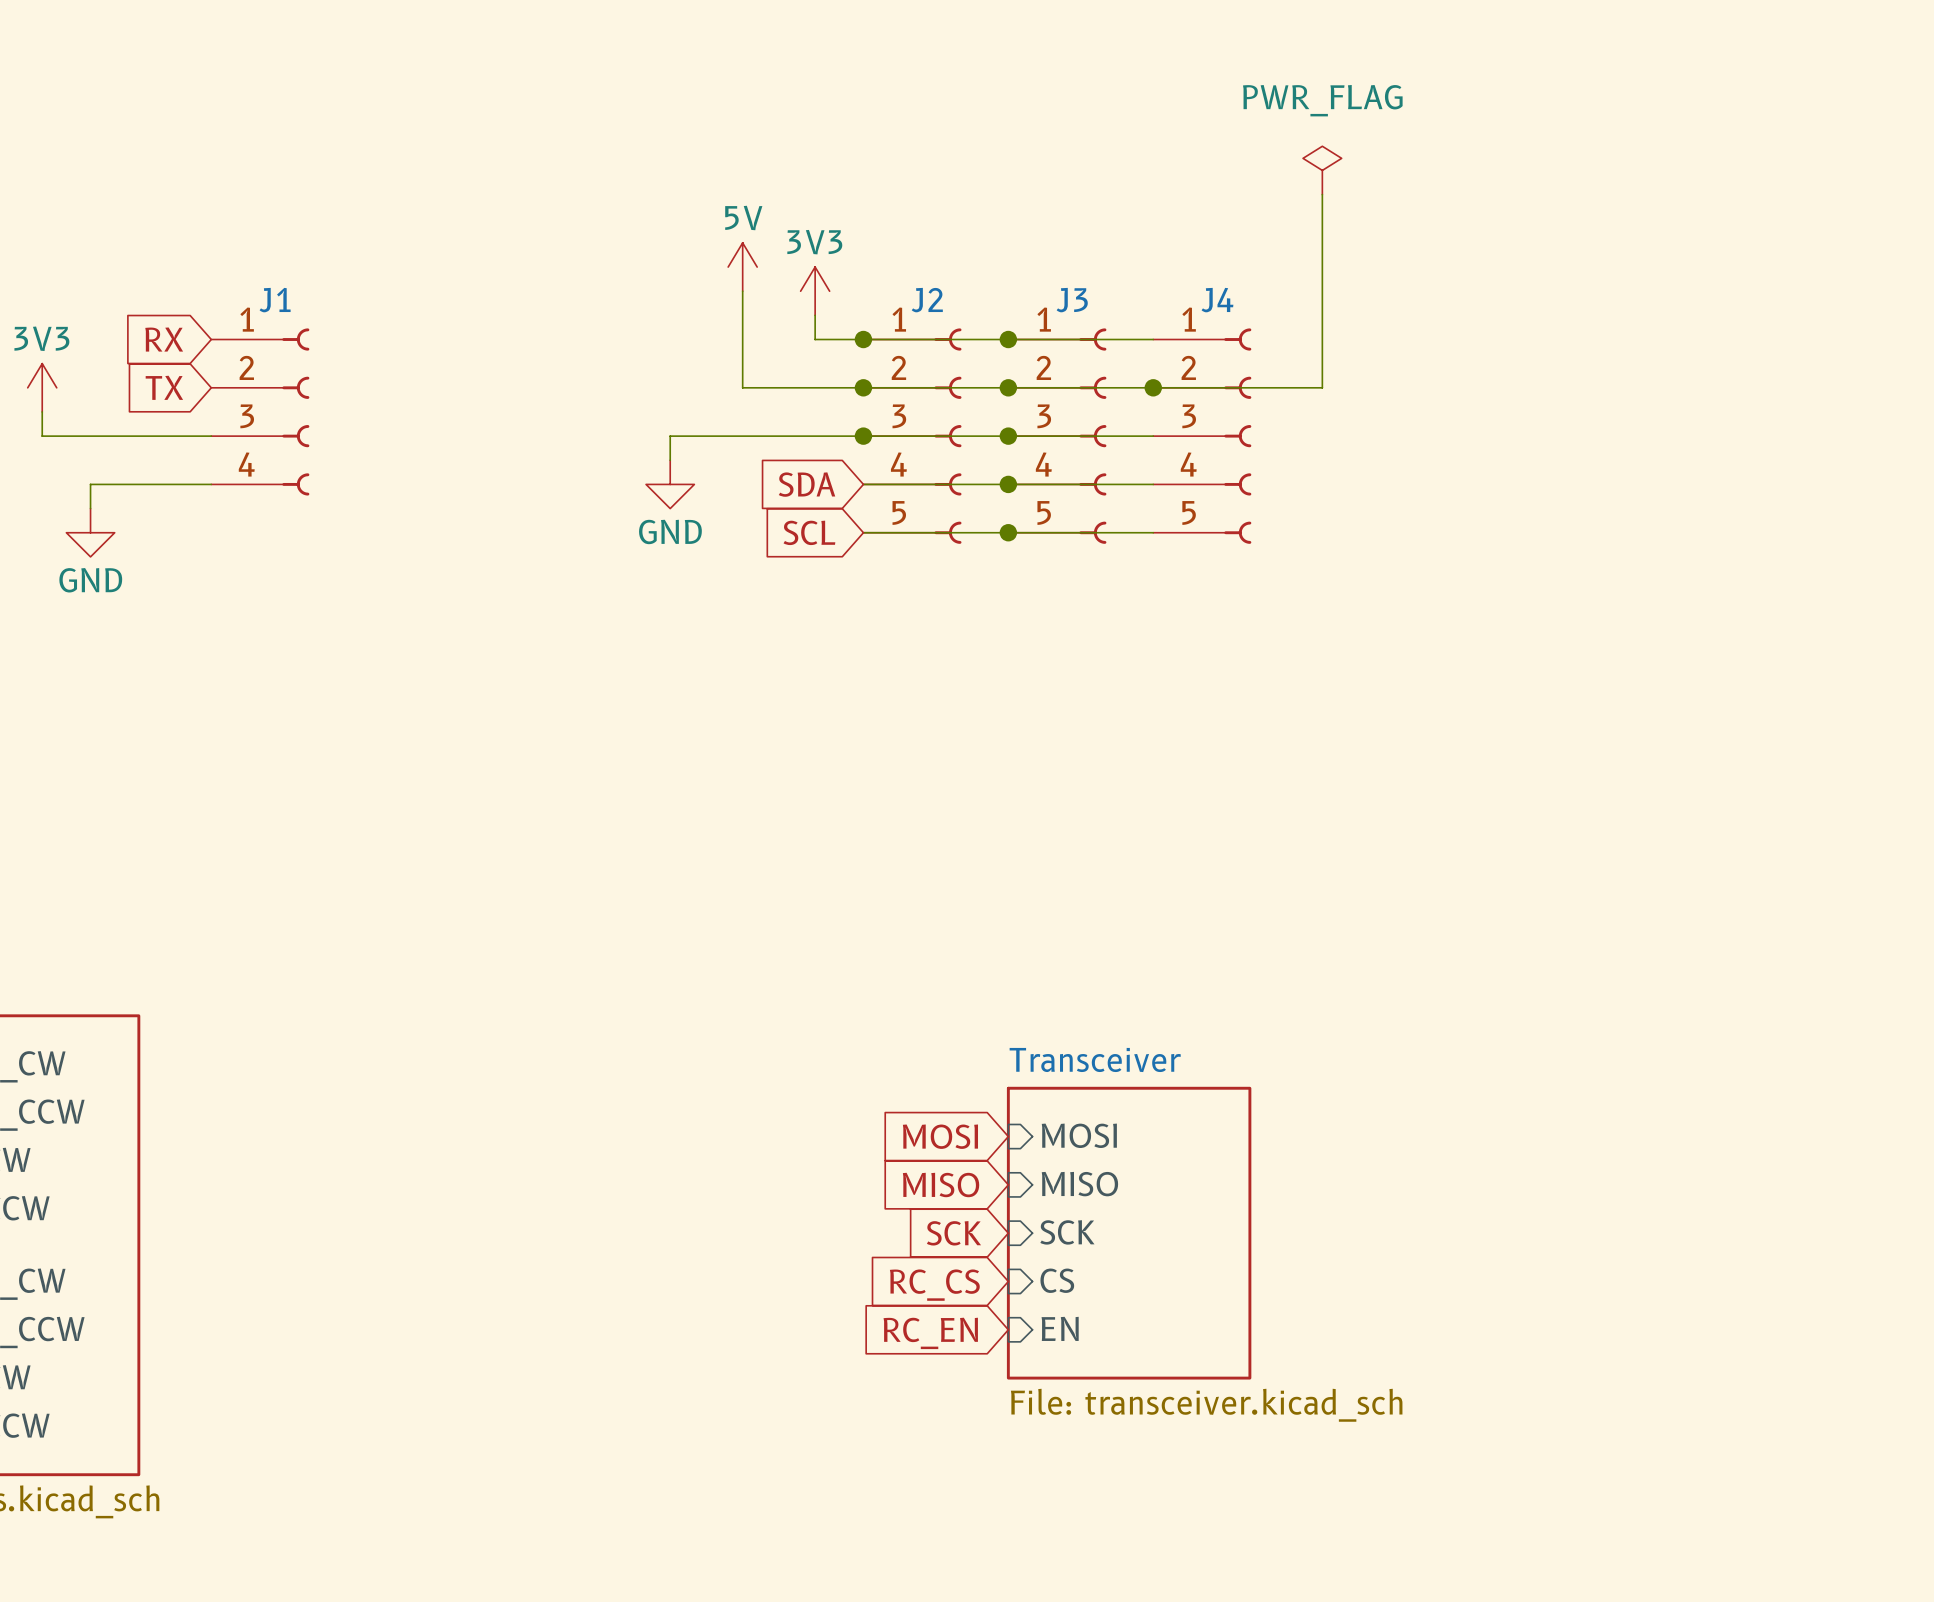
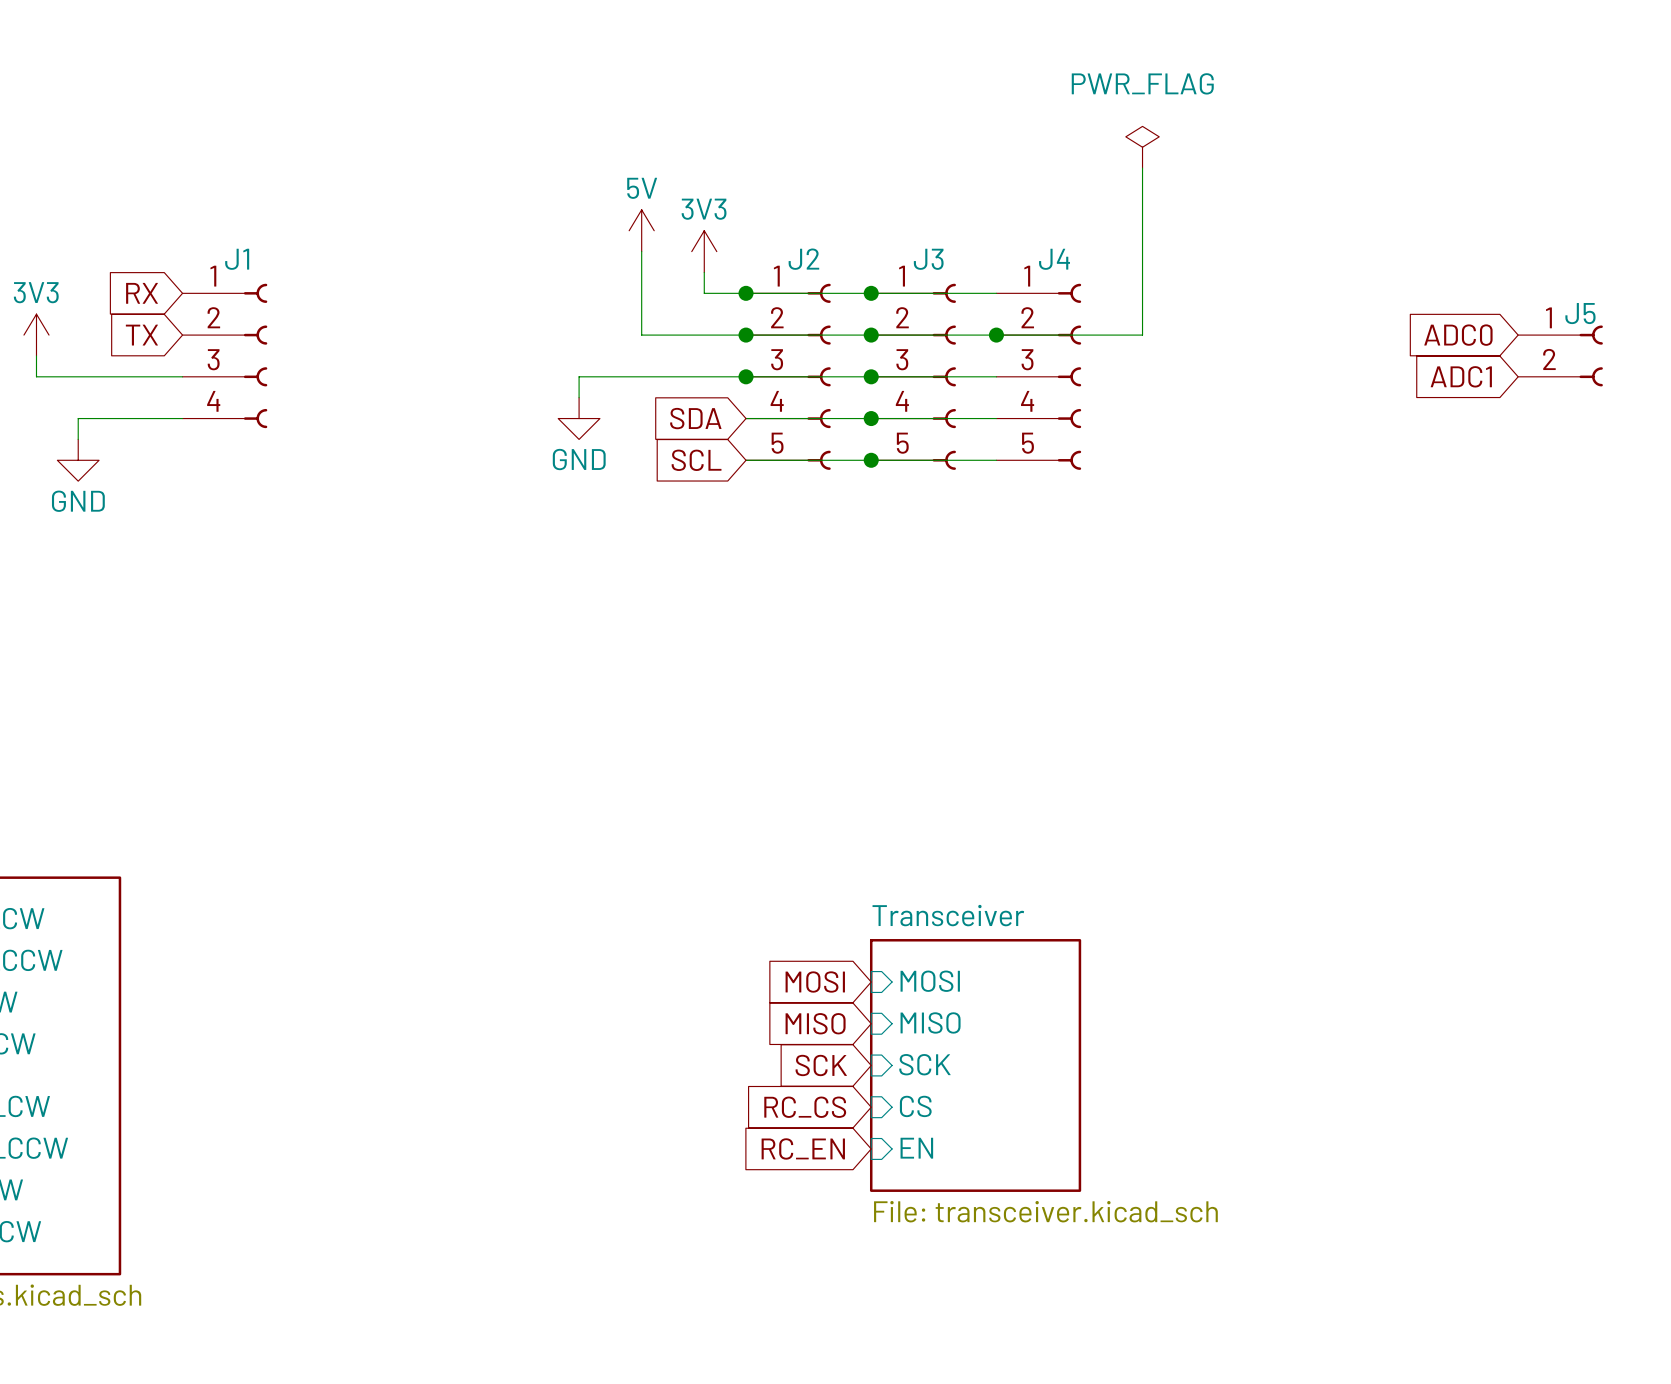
global label: none -> ADC0 (1458, 335)
J5: none -> (1560, 355)
global label: none -> ADC1 (1461, 376)

